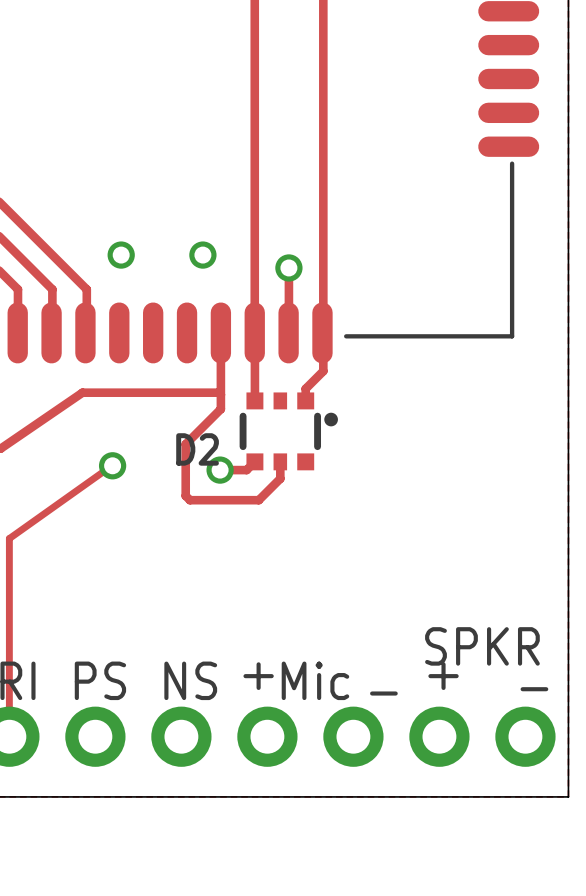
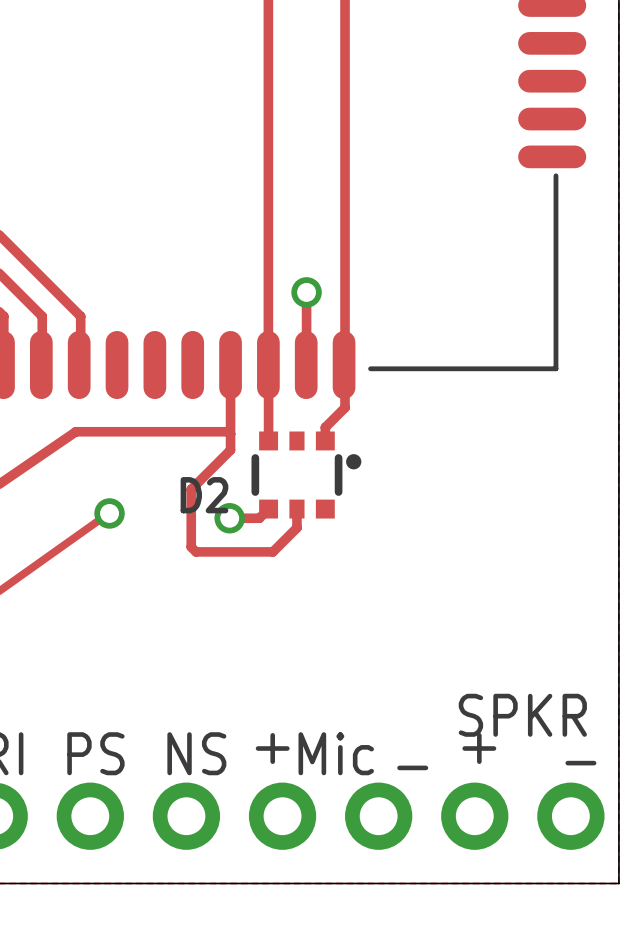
via: (121, 255) -> none
via: (202, 255) -> none

